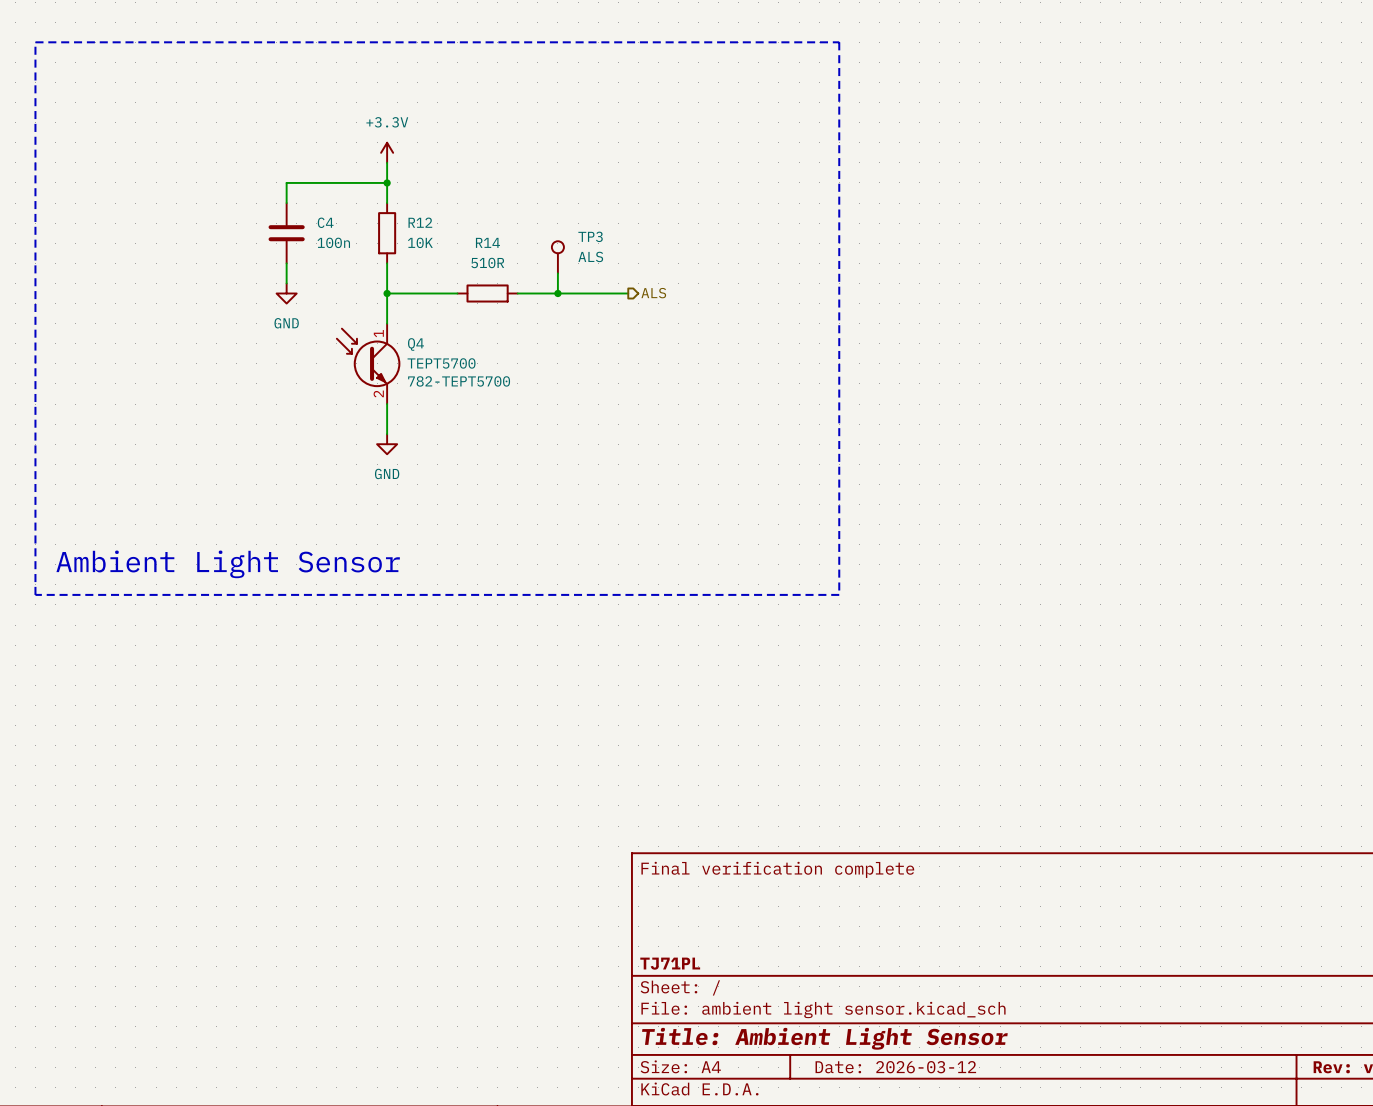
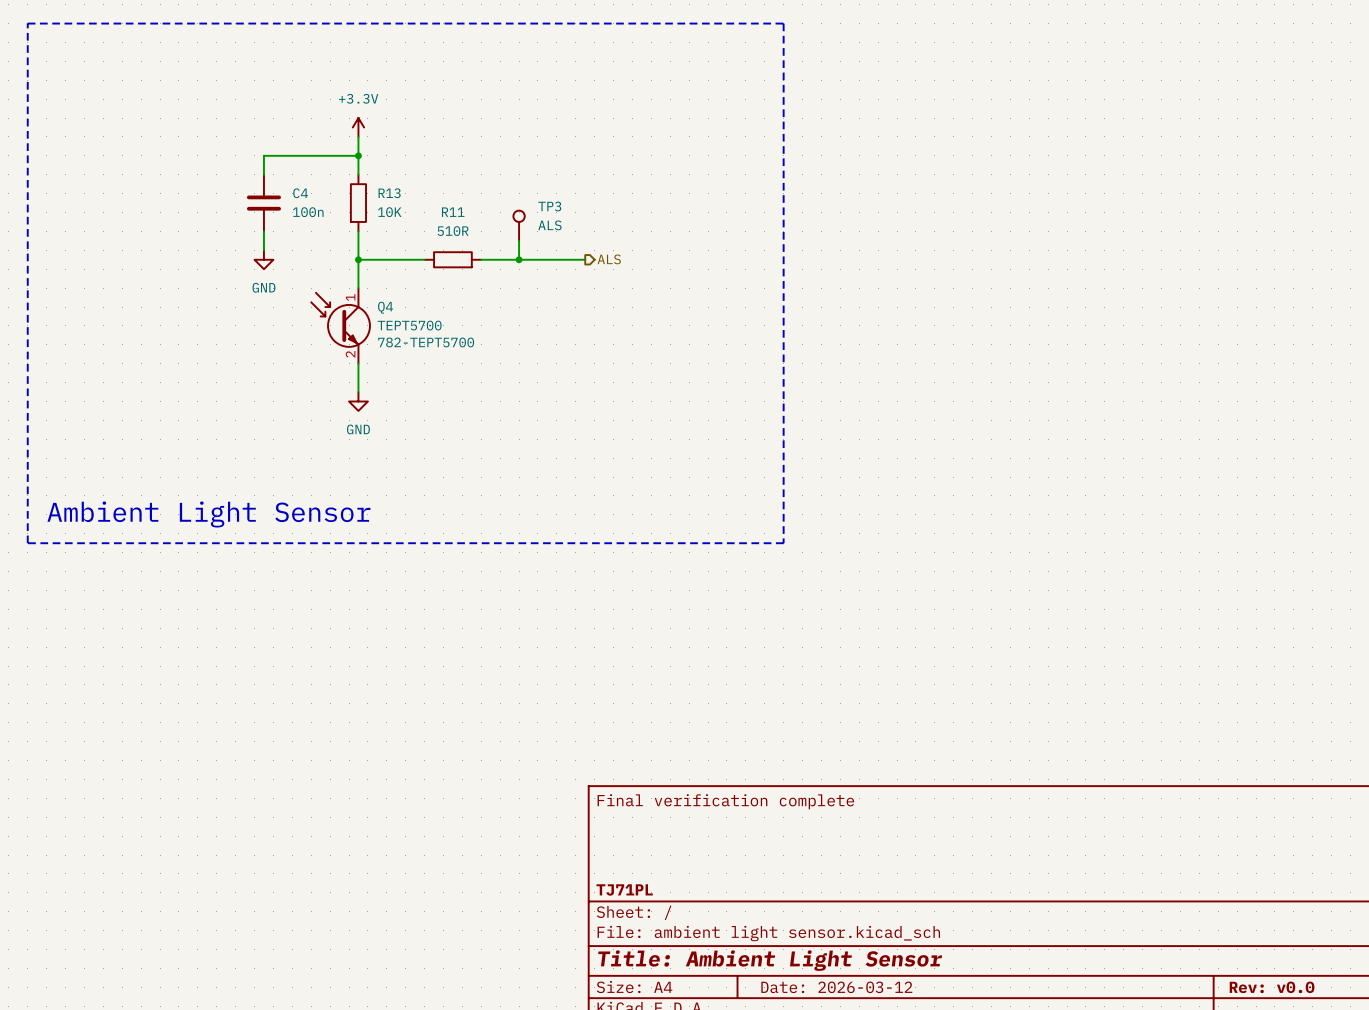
R12 name: R12 (420, 222) -> R13 (389, 193)
R14 name: R14 (487, 242) -> R11 (453, 212)

